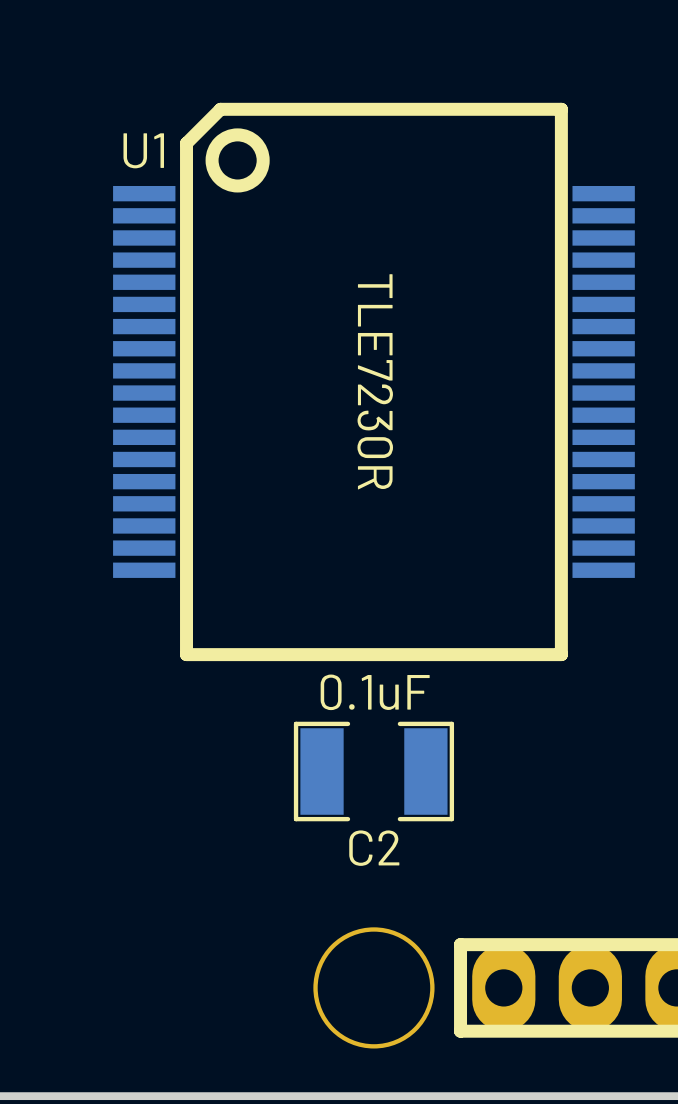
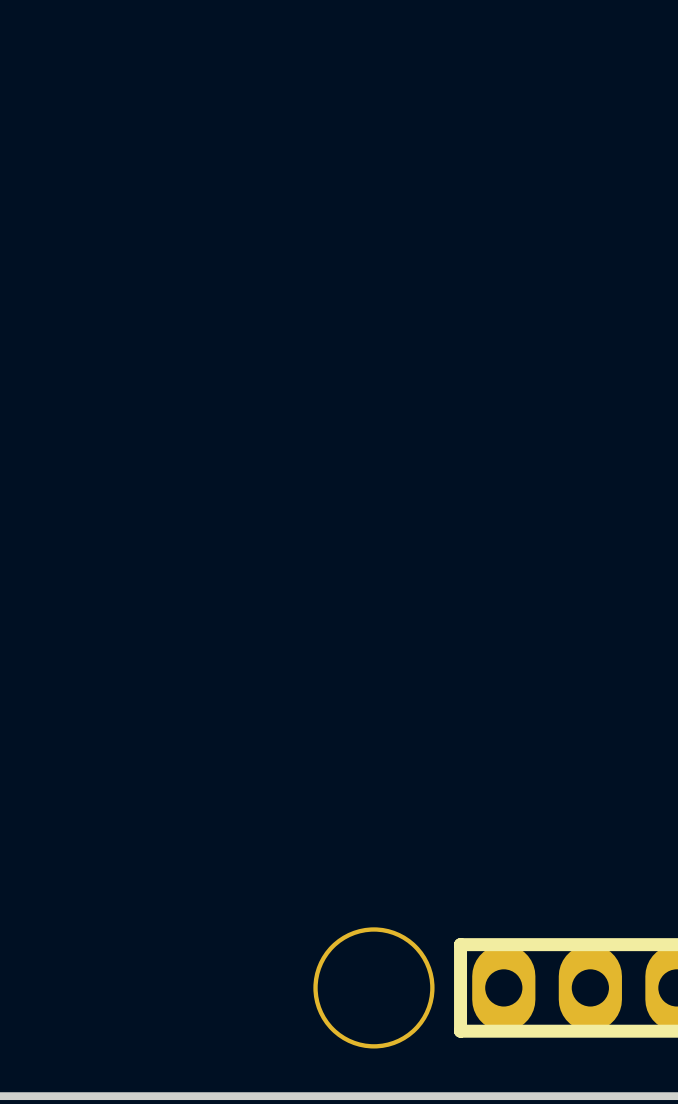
U1: TLE7230R (373, 381) -> none
C2: 0.1uF (373, 771) -> none

